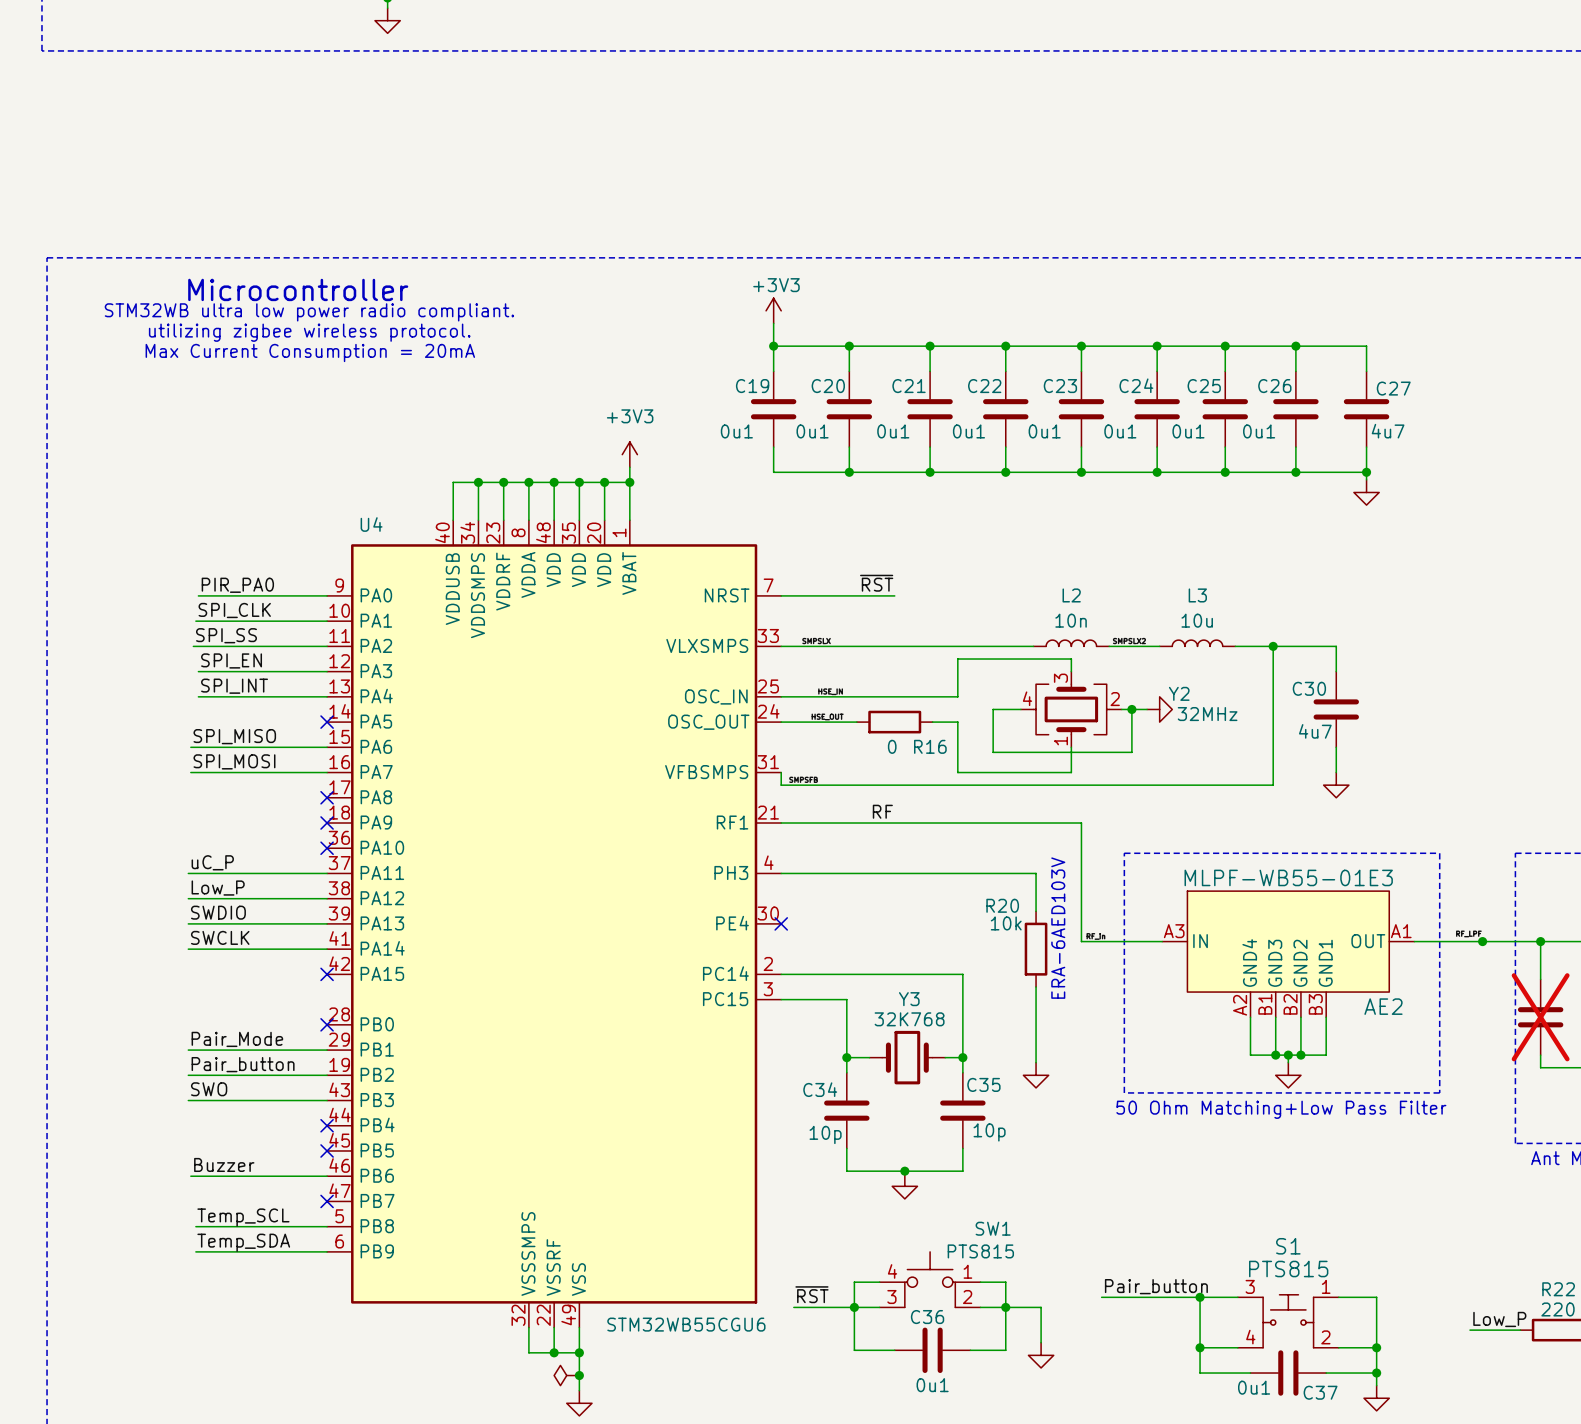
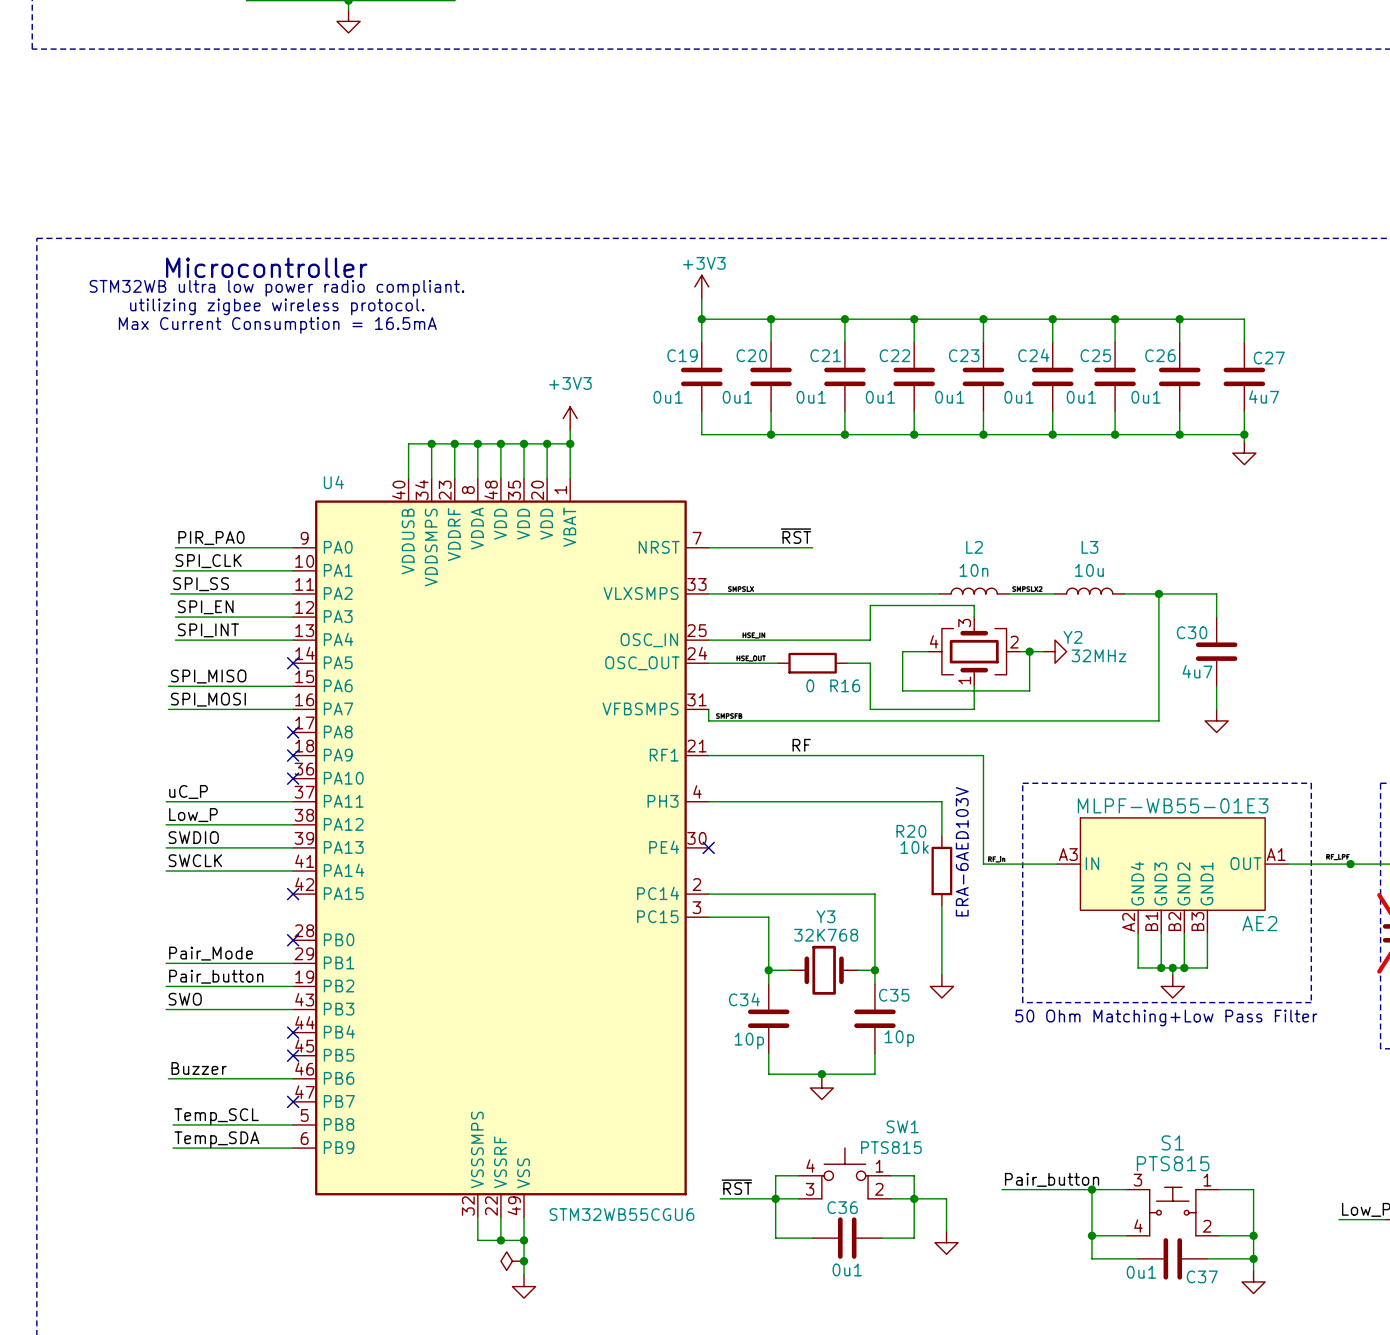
text: Max Current Consumption = 20mA (310, 353) -> Max Current Consumption = 16.5mA (277, 325)

